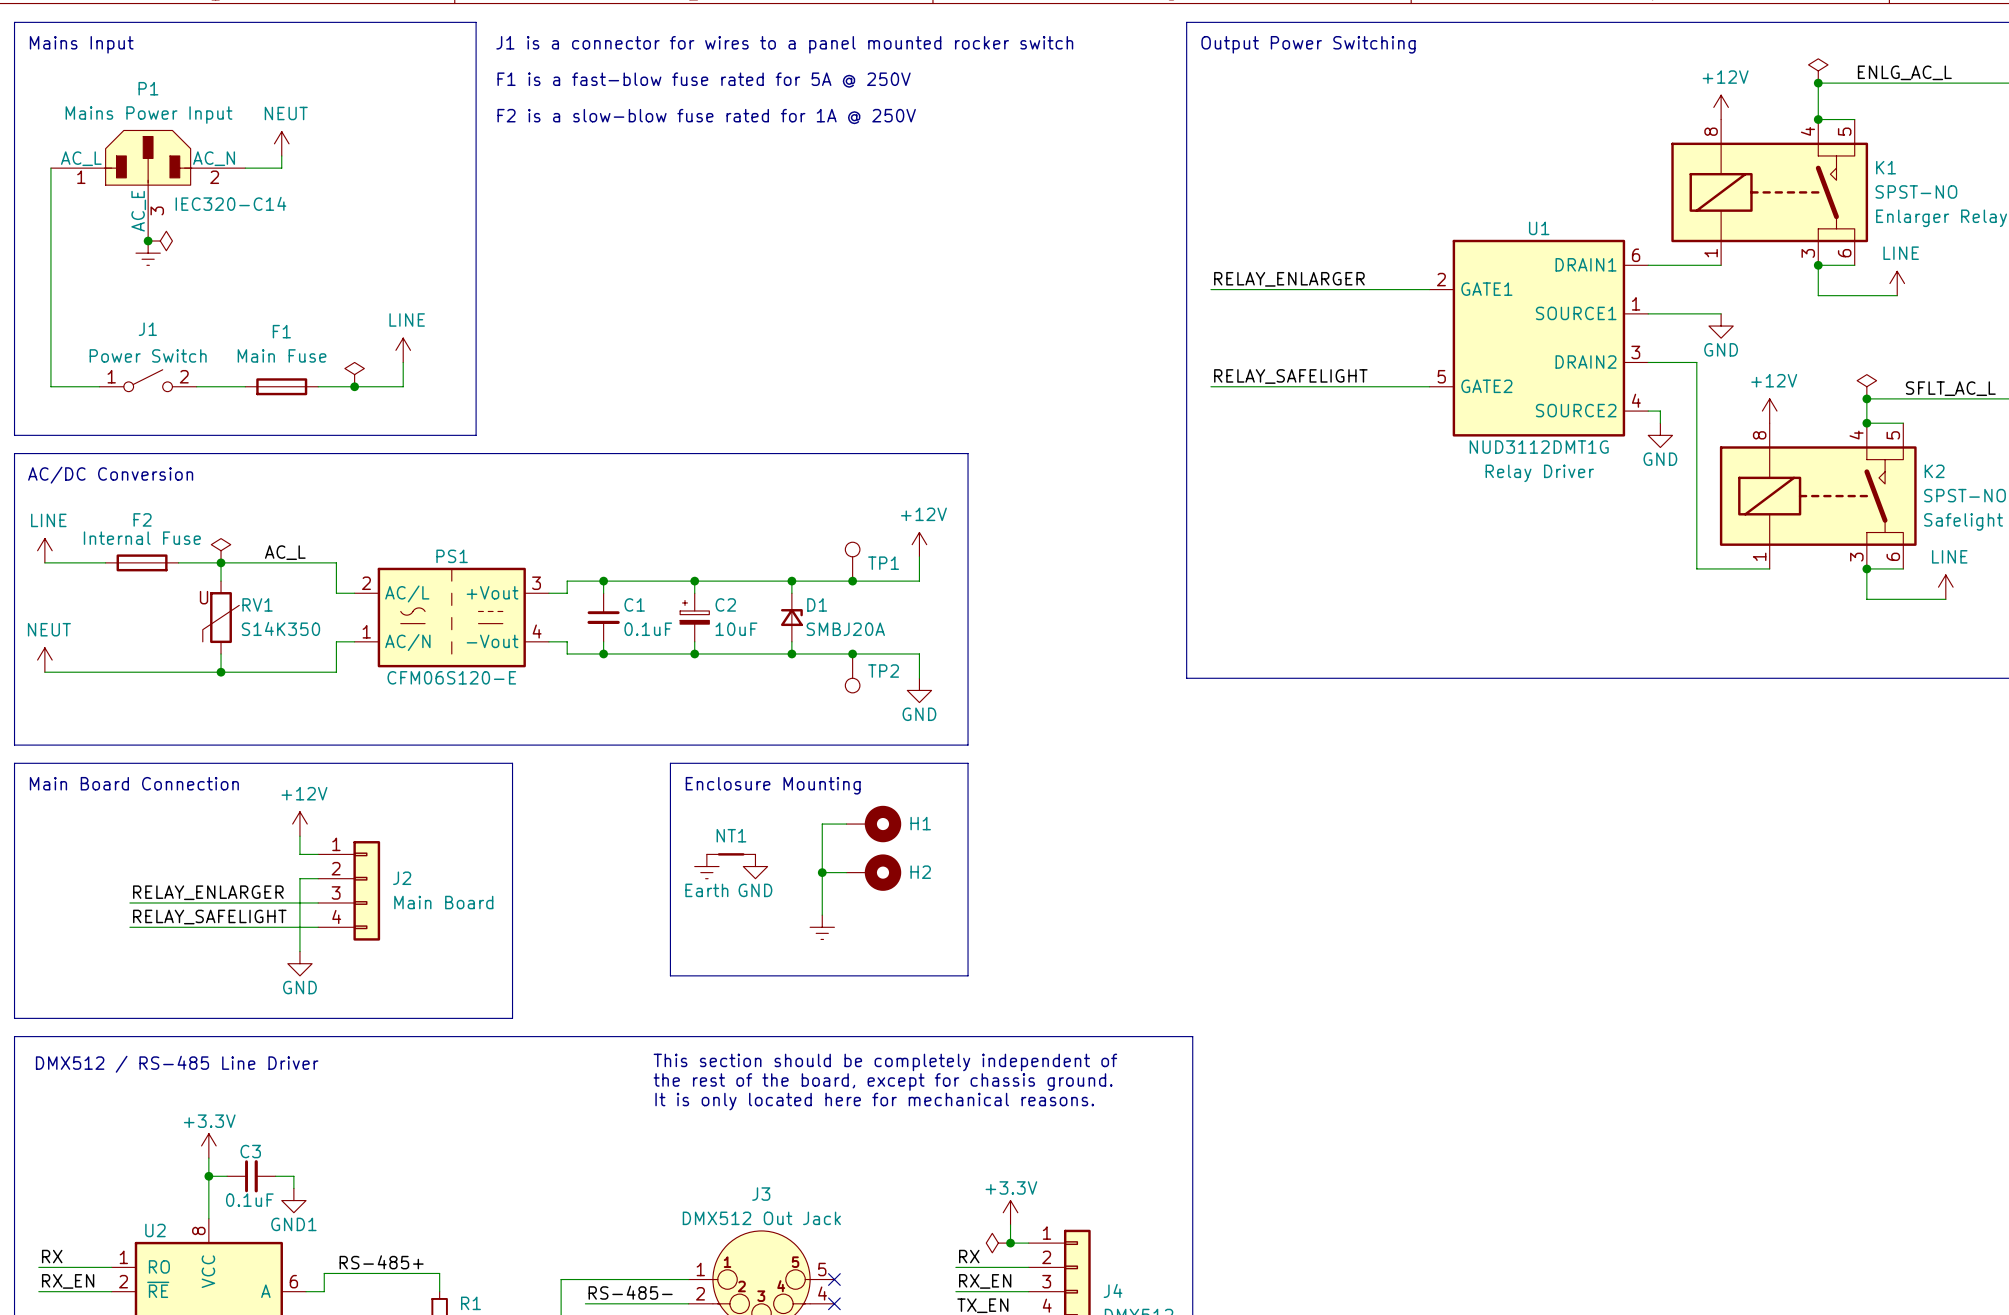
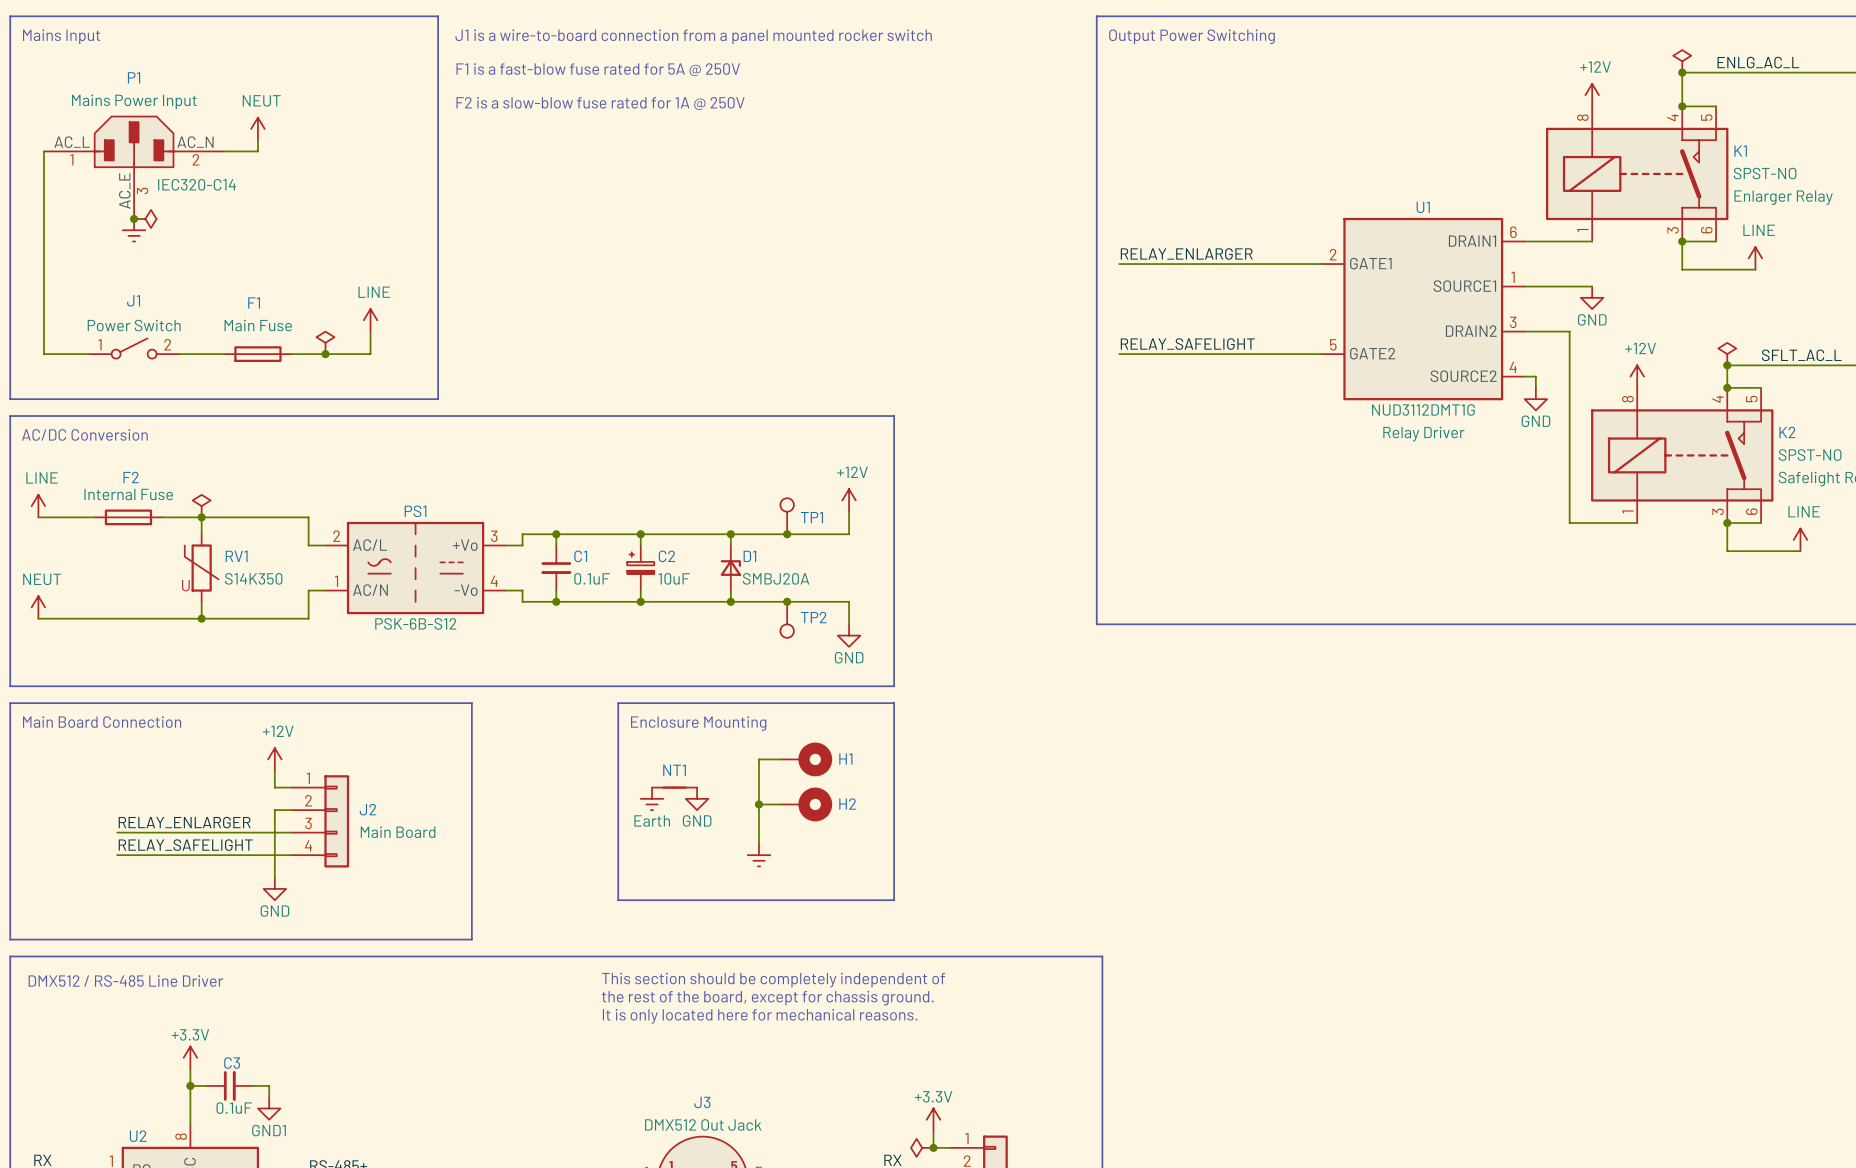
text: J1 is a connector for wires to a panel mounted rocker switch (784, 44) -> J1 is a wire-to-board connection from a panel mounted rocker switch (693, 36)
label: AC_L (285, 552) -> none
PS1 pin name: +Vout (492, 592) -> +Vo (465, 545)
RV1 flip: as is (221, 617) -> up-down (201, 568)
PS1 pin name: -Vout (492, 641) -> -Vo (466, 590)
PS1 value: CFM06S120-E (451, 677) -> PSK-6B-S12 (415, 623)

